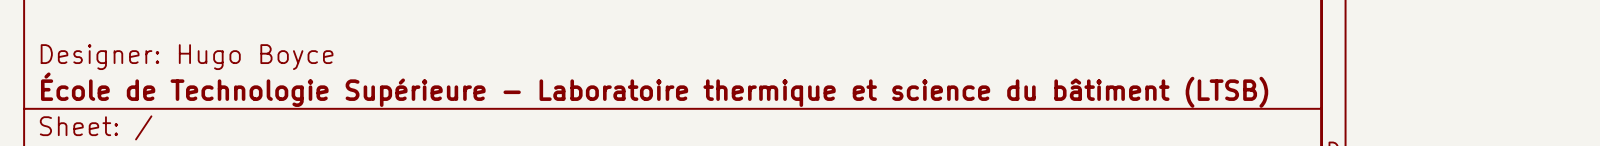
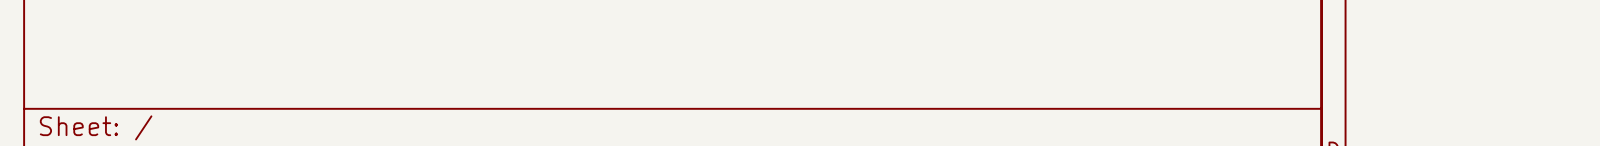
title block: Designer: Hugo Boyce (187, 57) -> none
title block: École de Technologie Supérieure - Laboratoire thermique et science du bâtiment (LTSB) (654, 90) -> none

